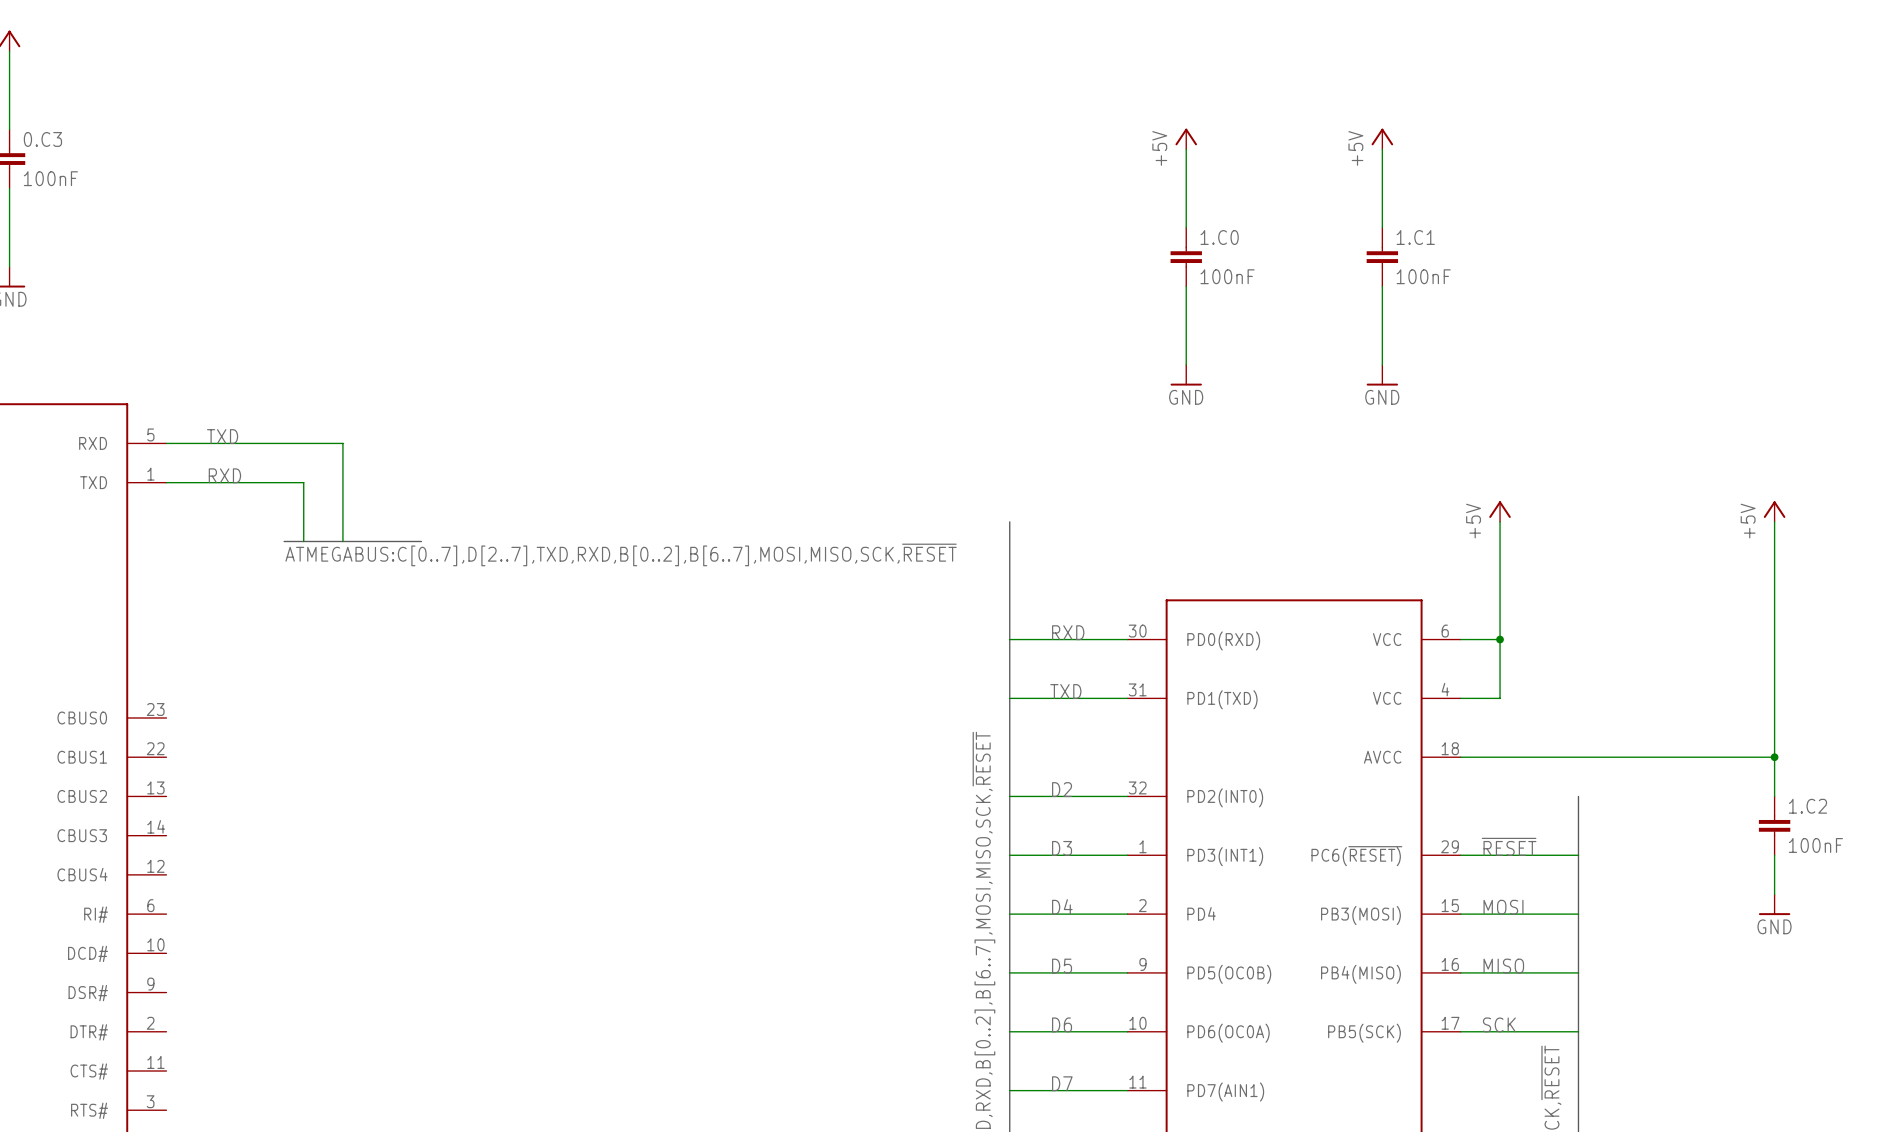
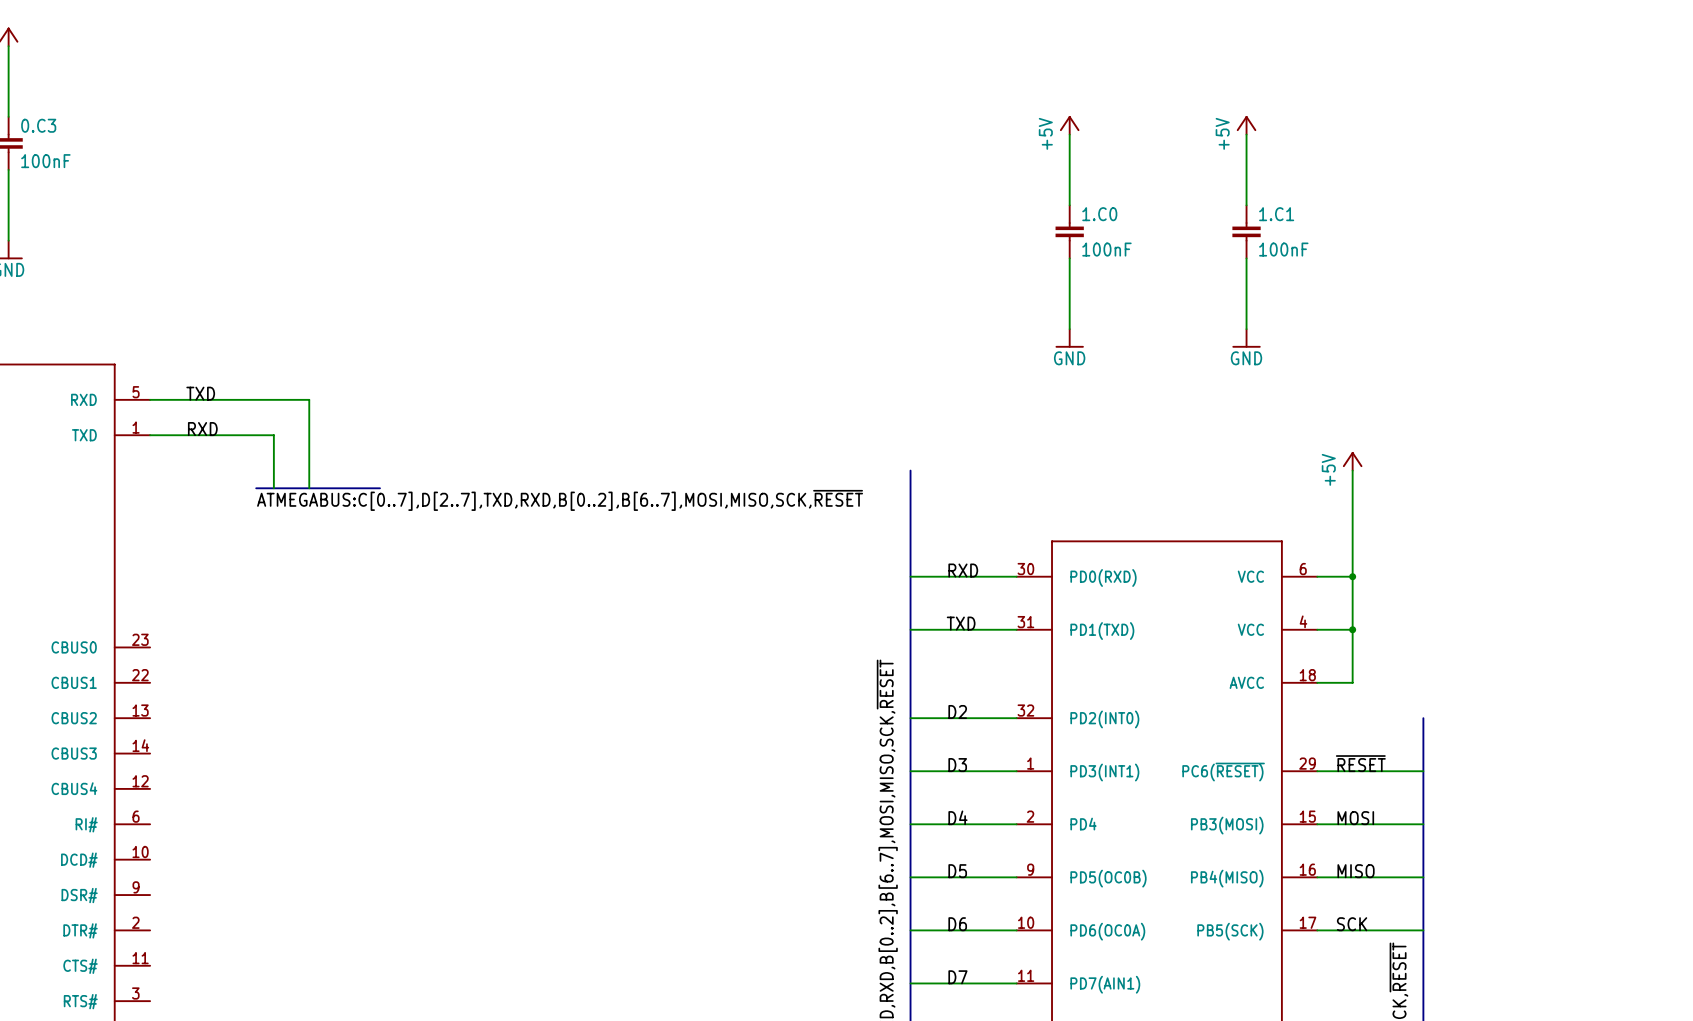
power symbol: +5V (1774, 511) -> none
wire: (1774, 521) (1774, 796) -> none
junction: none -> (1352, 629)
wire: (1500, 757) (1774, 757) -> (1352, 682) (1352, 629)
junction: (1774, 757) -> none
1.C2: 100nF (1774, 825) -> none
wire: (1774, 855) (1774, 894) -> none
power symbol: GND (1774, 904) -> none

